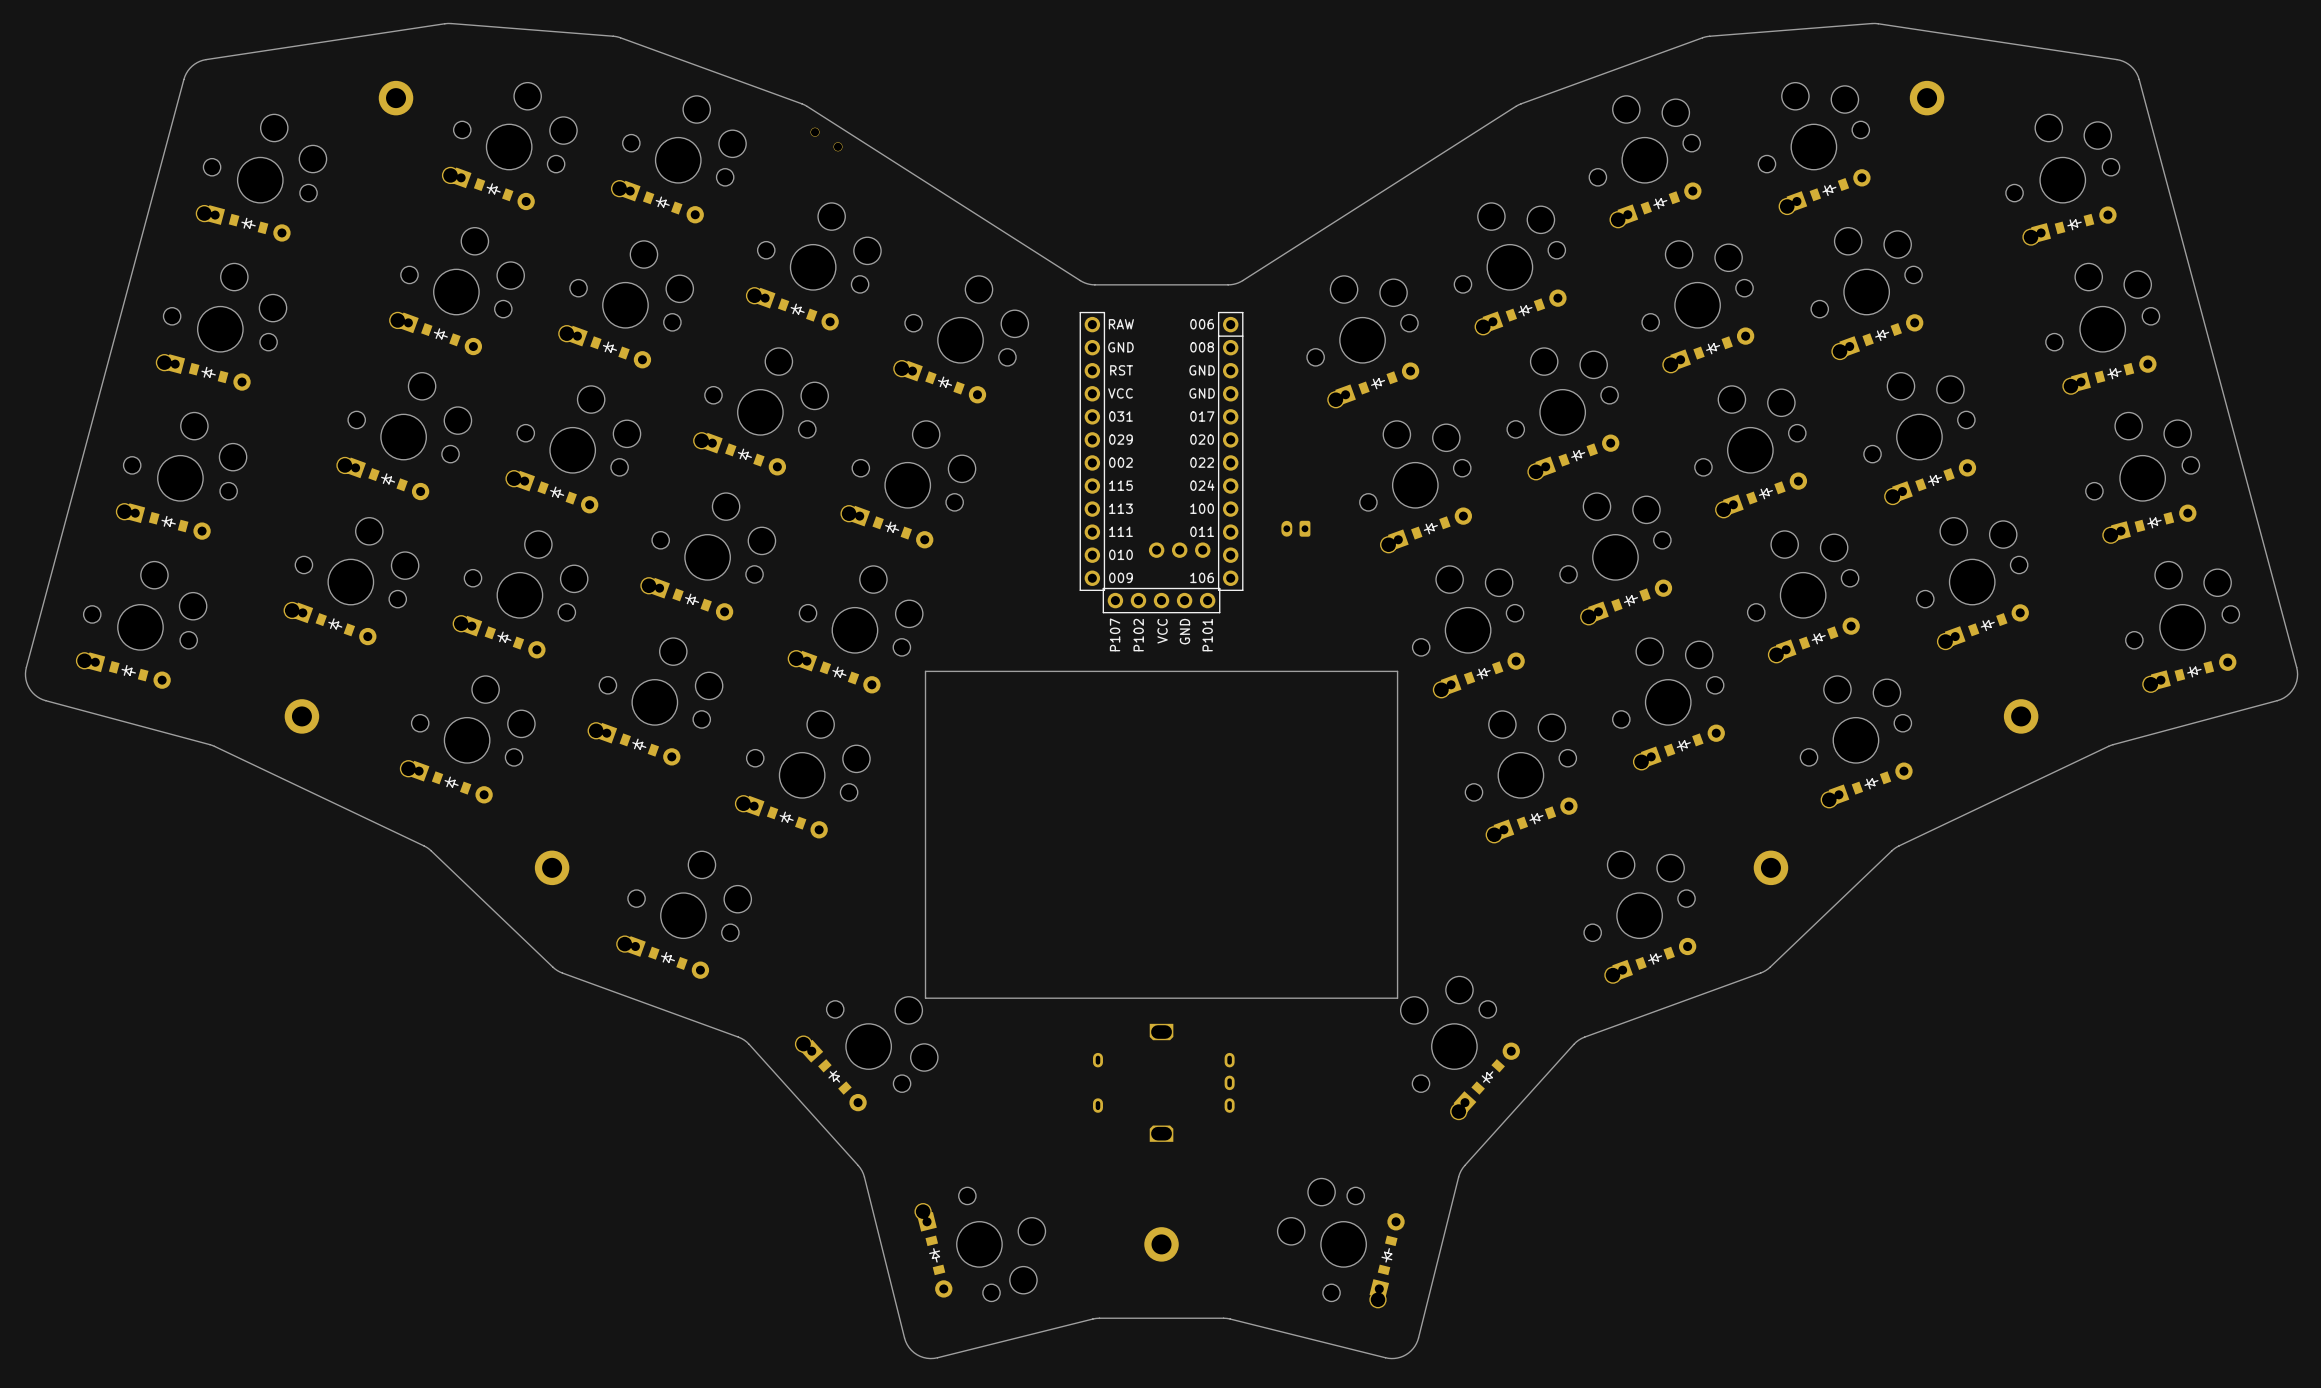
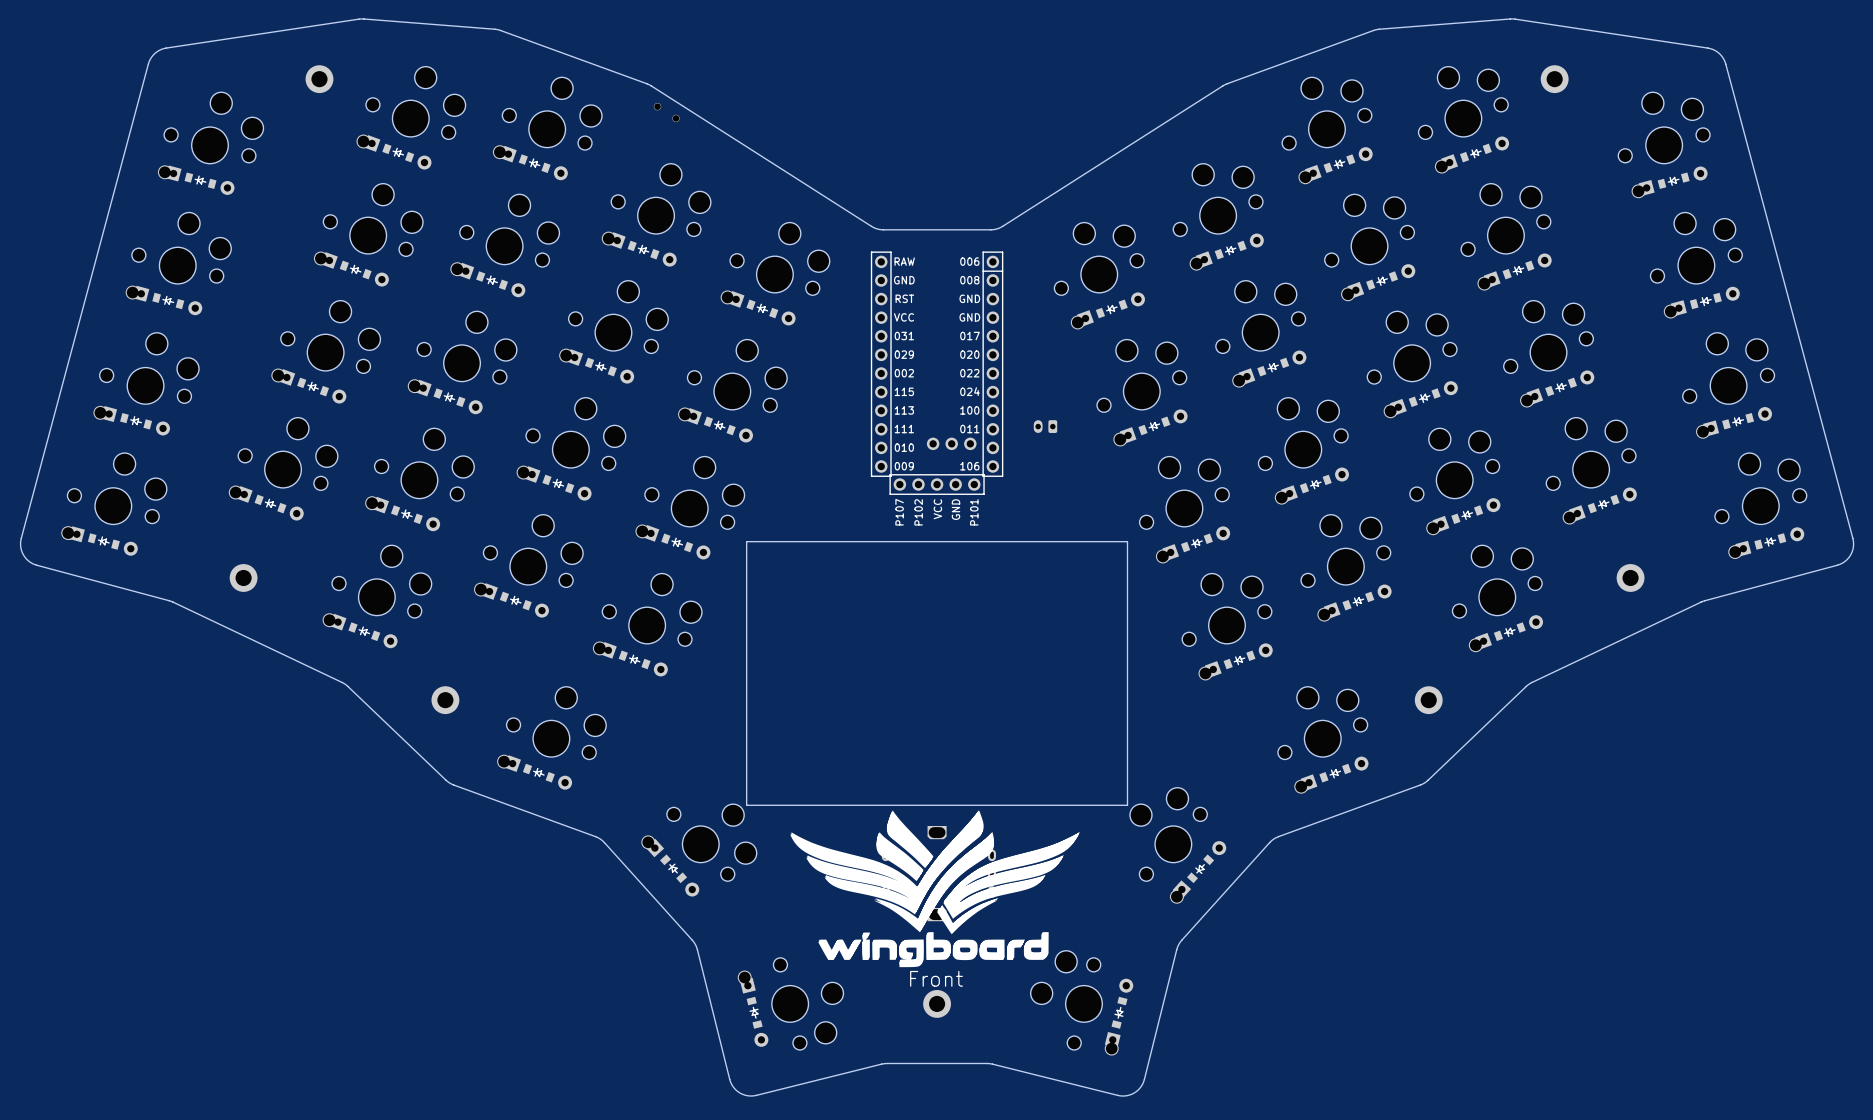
drawing: none -> [790, 810, 1080, 968]
text: none -> Front (936, 978)

